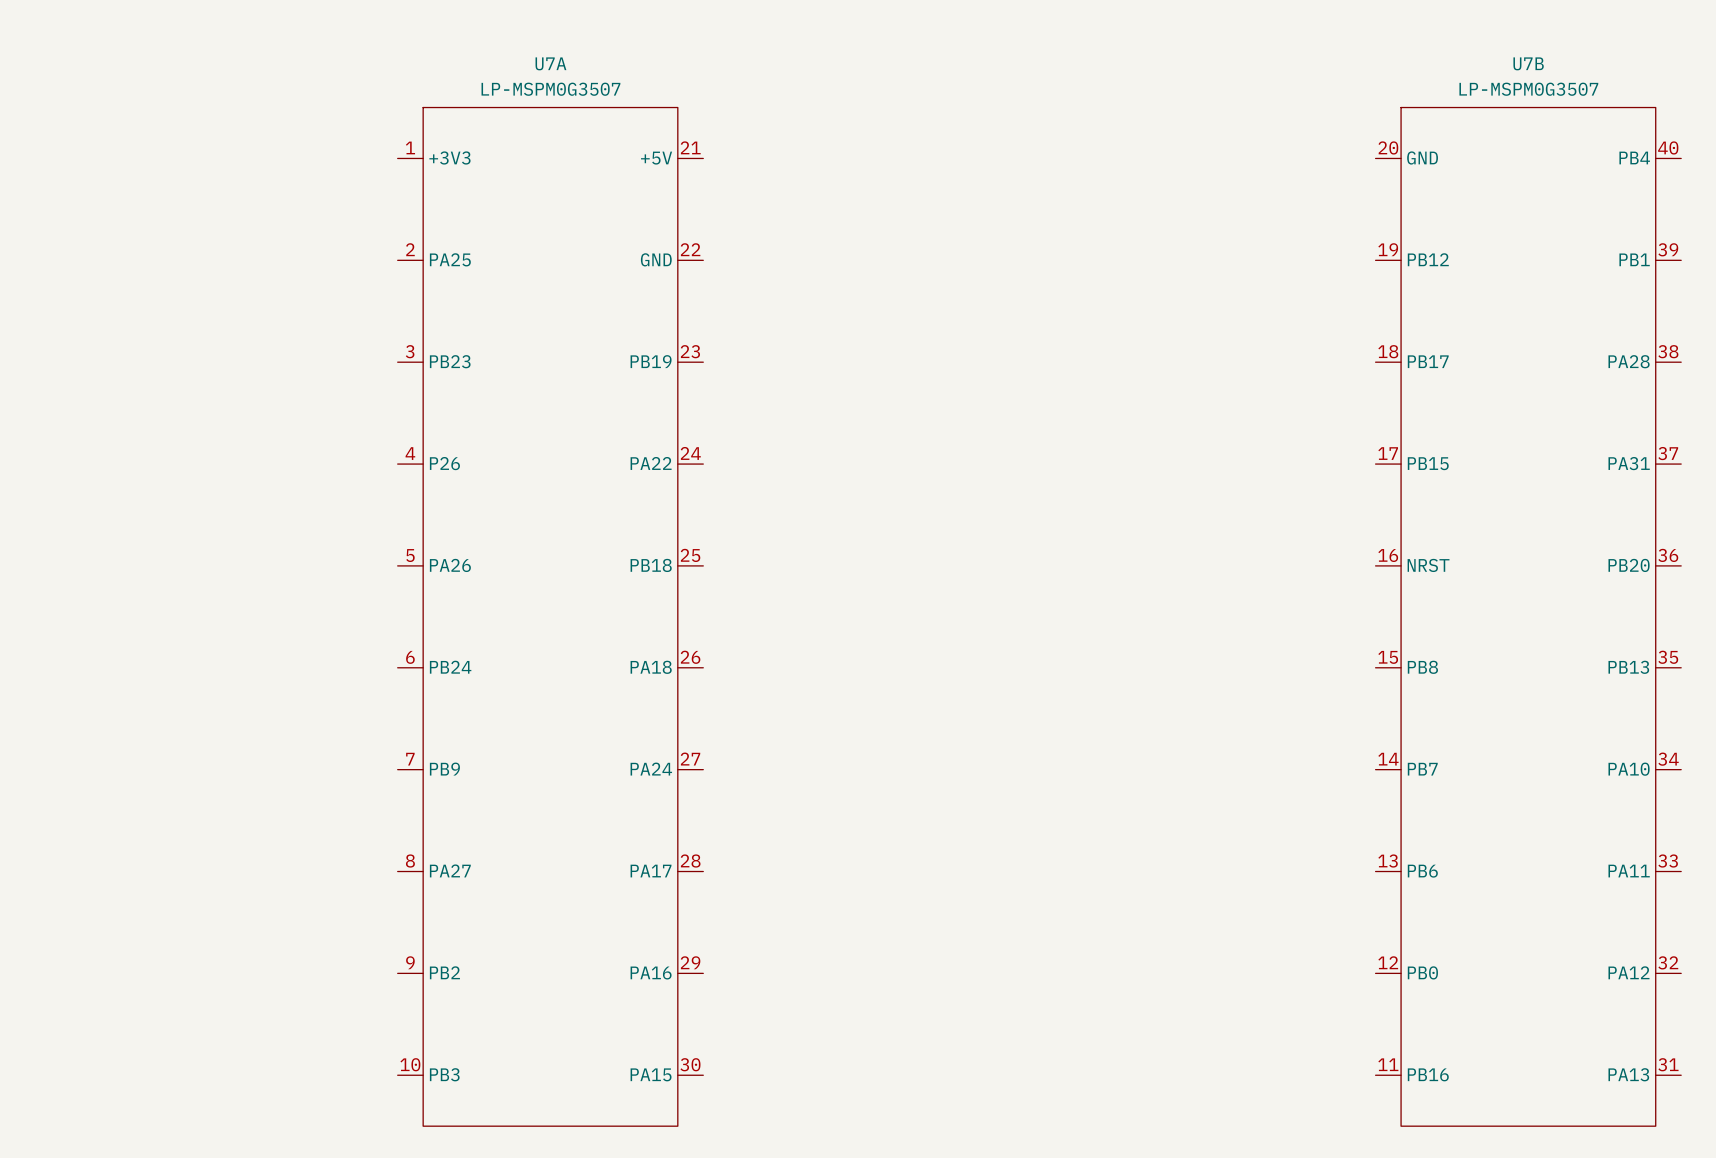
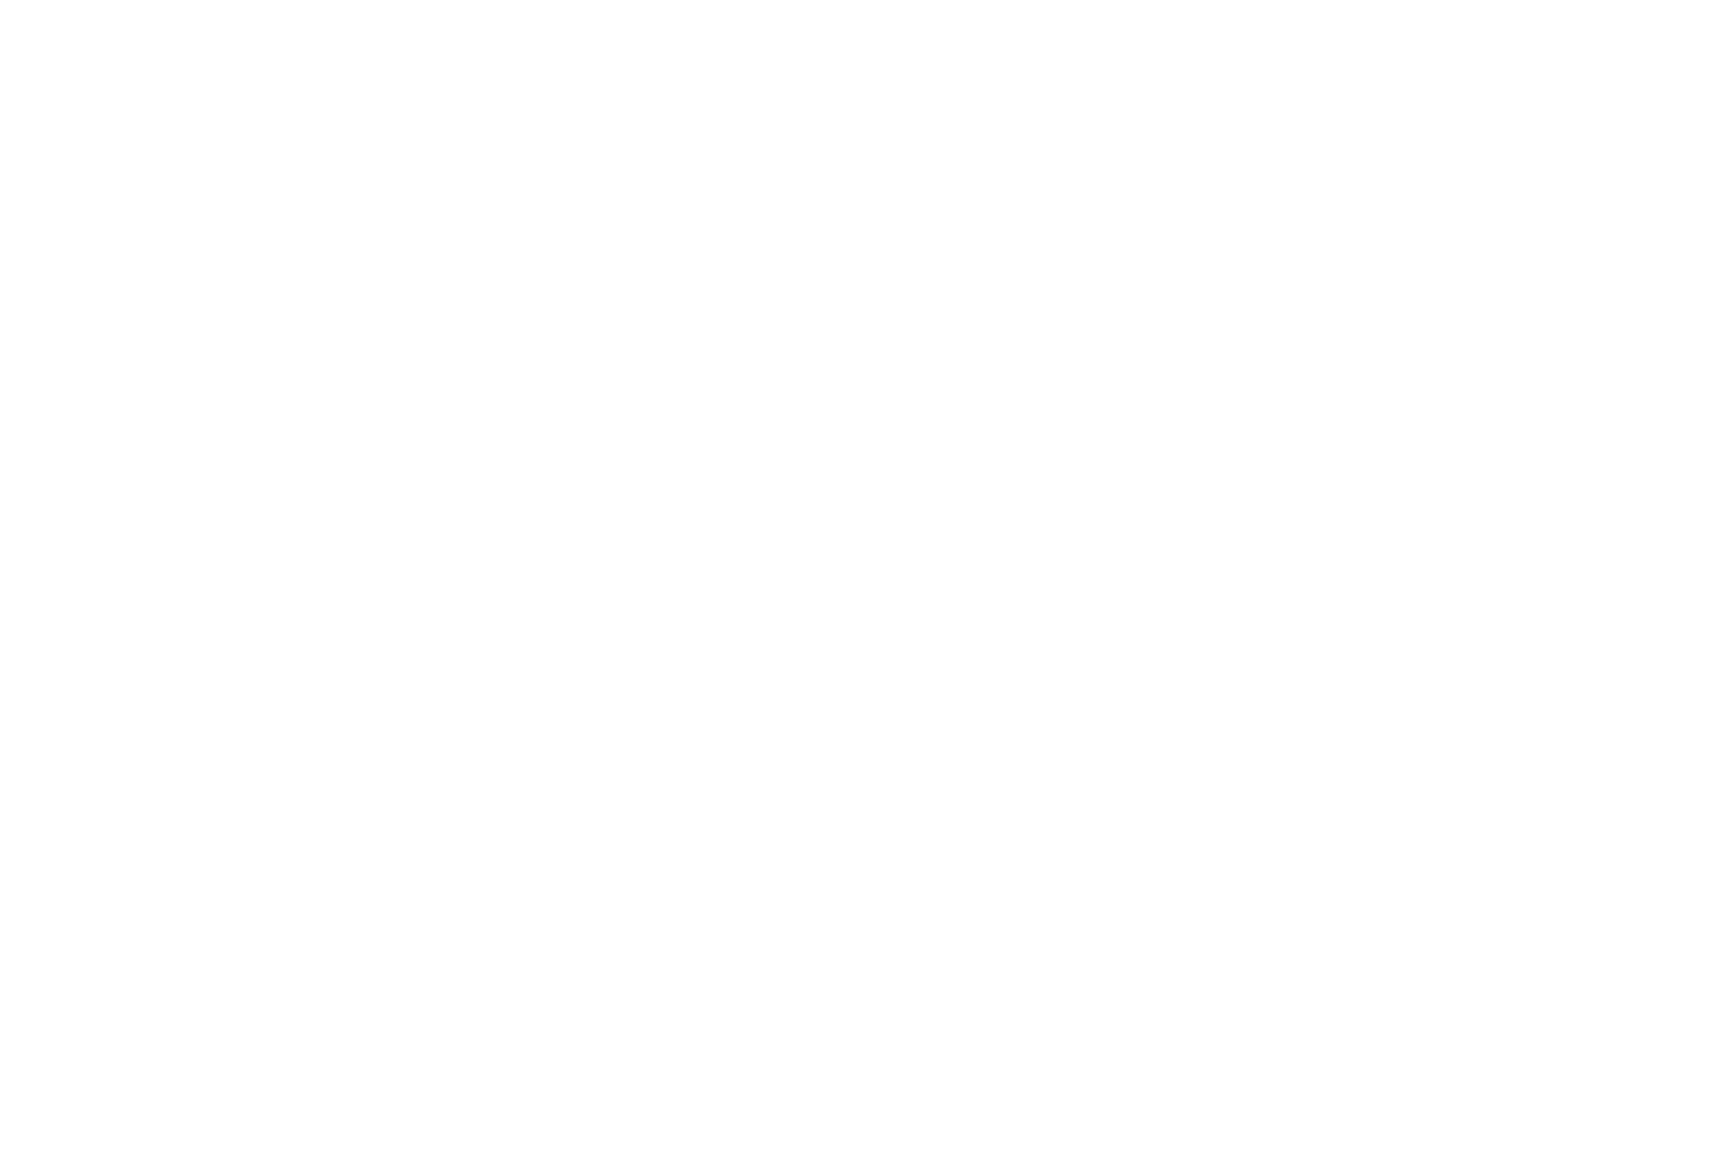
U7A: LP-MSPM0G3507 (550, 616) -> none
U7B: LP-MSPM0G3507 (1528, 616) -> none

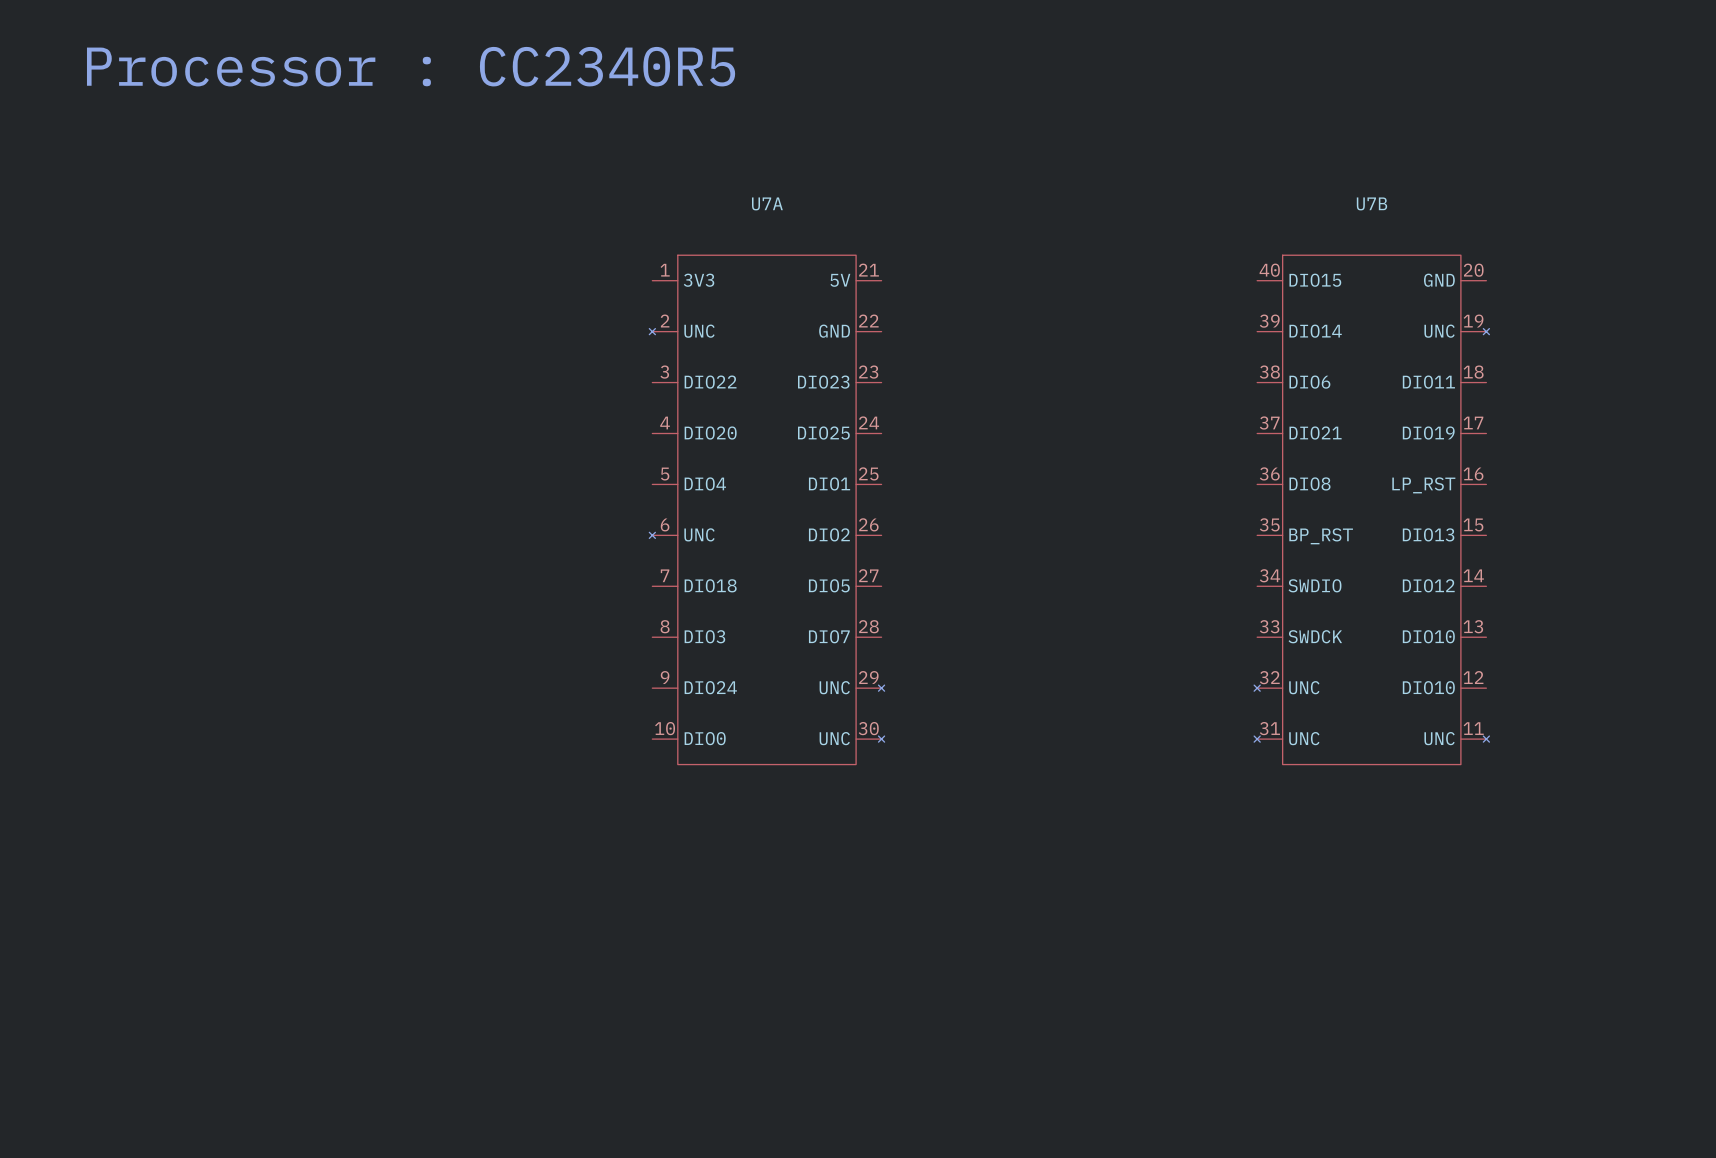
text: none -> Processor : CC2340R5 (411, 66)
U7A: none -> (766, 509)
U7B: none -> (1371, 509)

